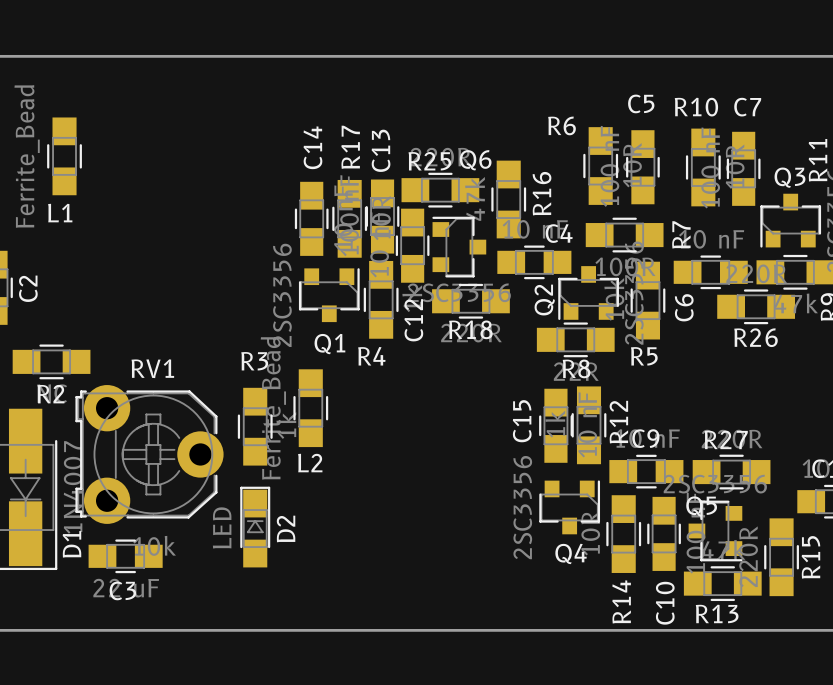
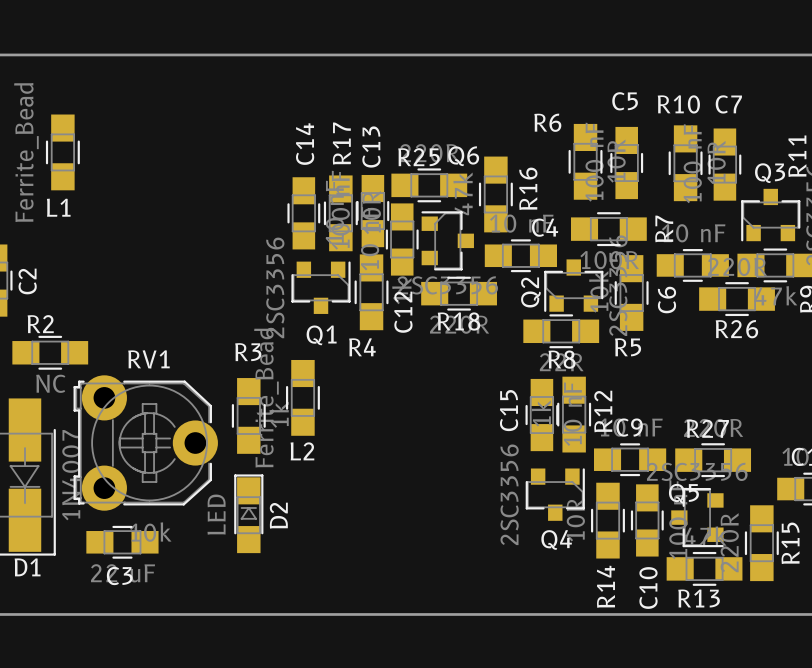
R2 name position: R2 (51, 394) -> R2 (40, 324)
D1 name rotation: 0° (71, 544) -> 90° clockwise (27, 567)
D1 name position: D1 (71, 544) -> D1 (27, 567)

